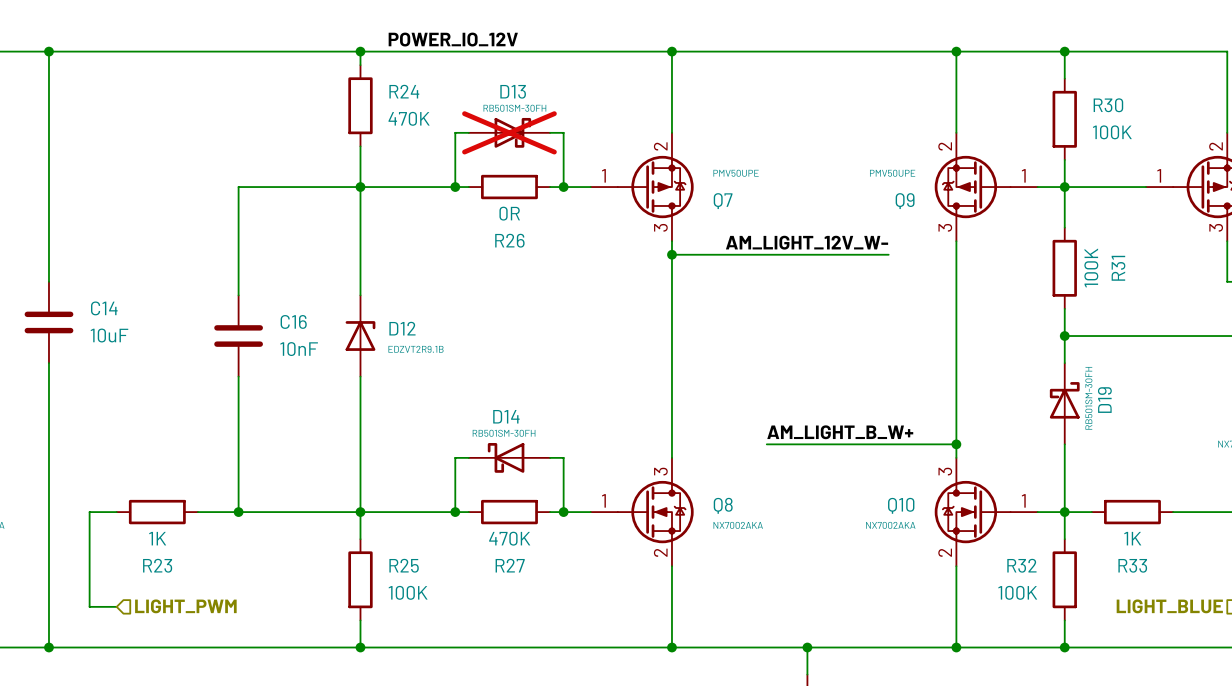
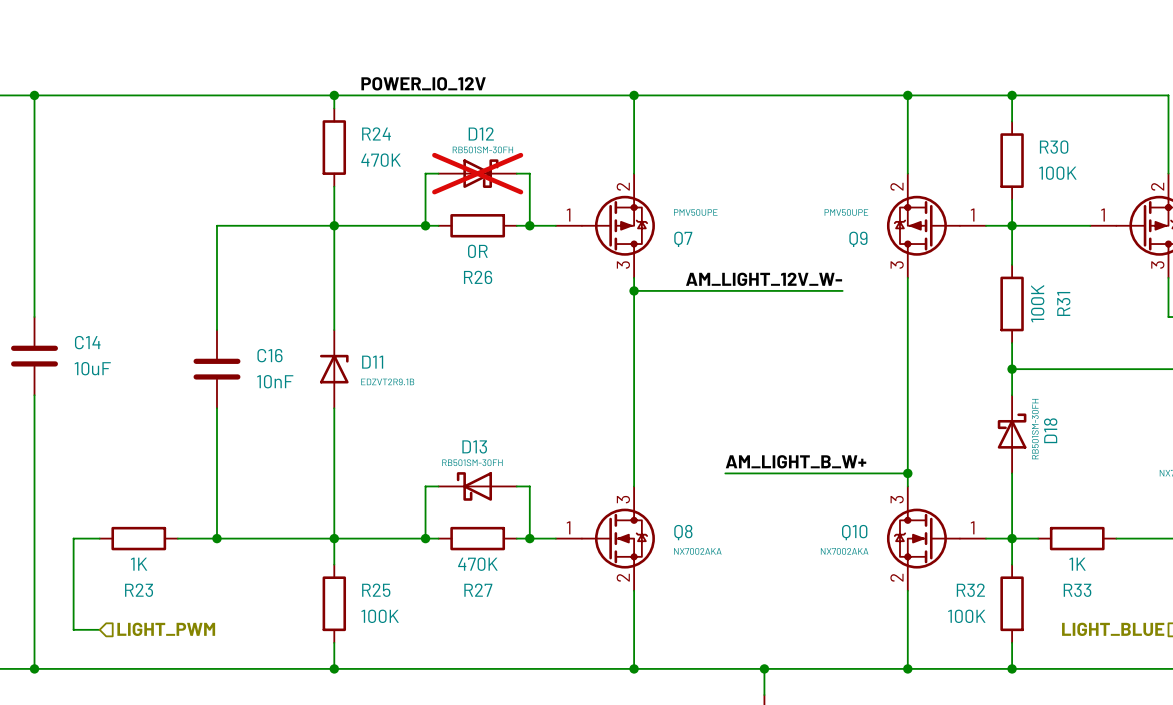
D13 name: D13 (513, 91) -> D12 (481, 133)
D12 name: D12 (402, 328) -> D11 (372, 362)
D19 name: D19 (1104, 400) -> D18 (1050, 430)
D14 name: D14 (506, 416) -> D13 (474, 446)

